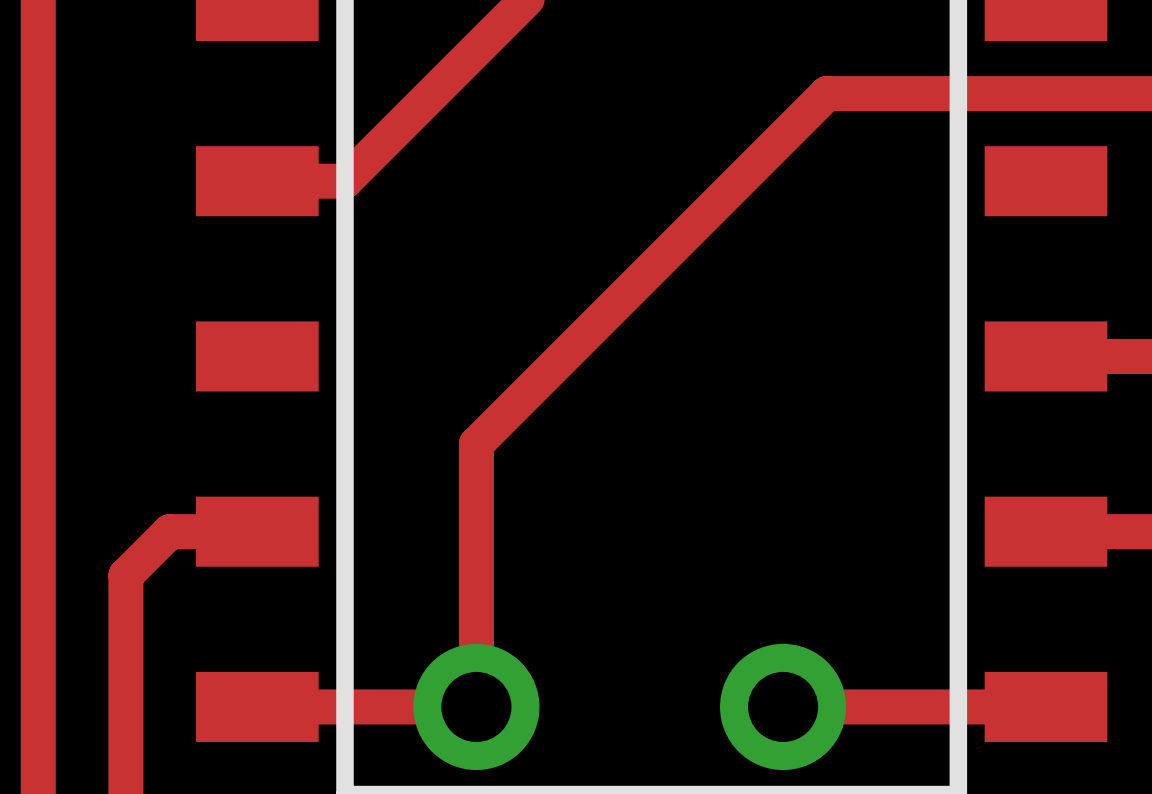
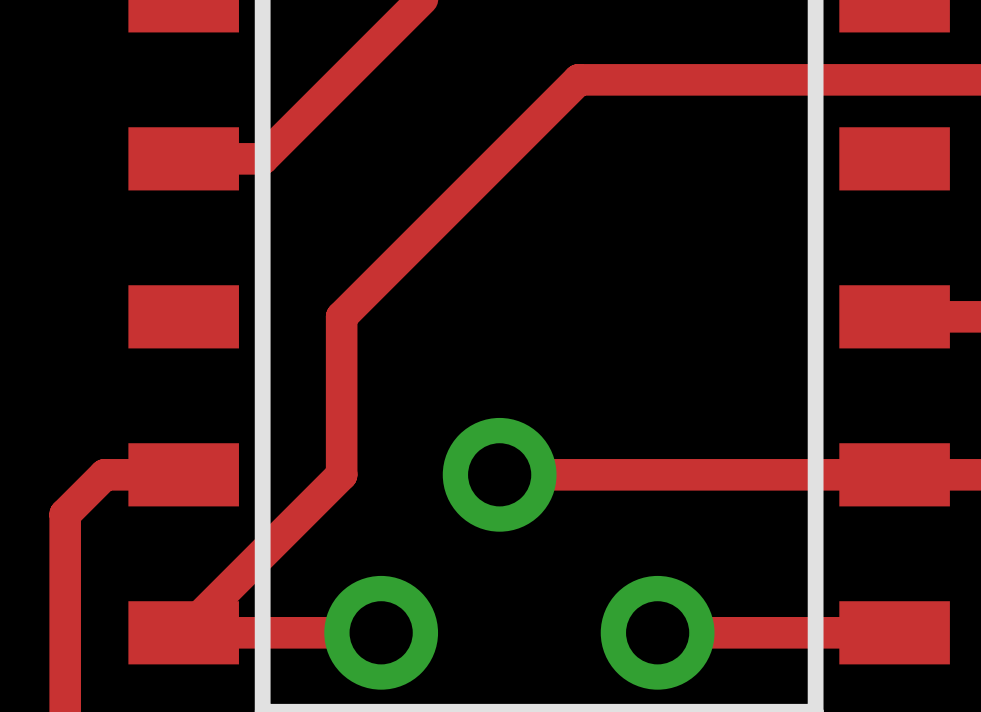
track: (826, 93) (476, 444) (476, 706) -> (697, 79) (578, 79) (341, 316) (341, 474) (183, 632)
track: none -> (499, 474) (894, 474)
via: none -> (499, 474)

